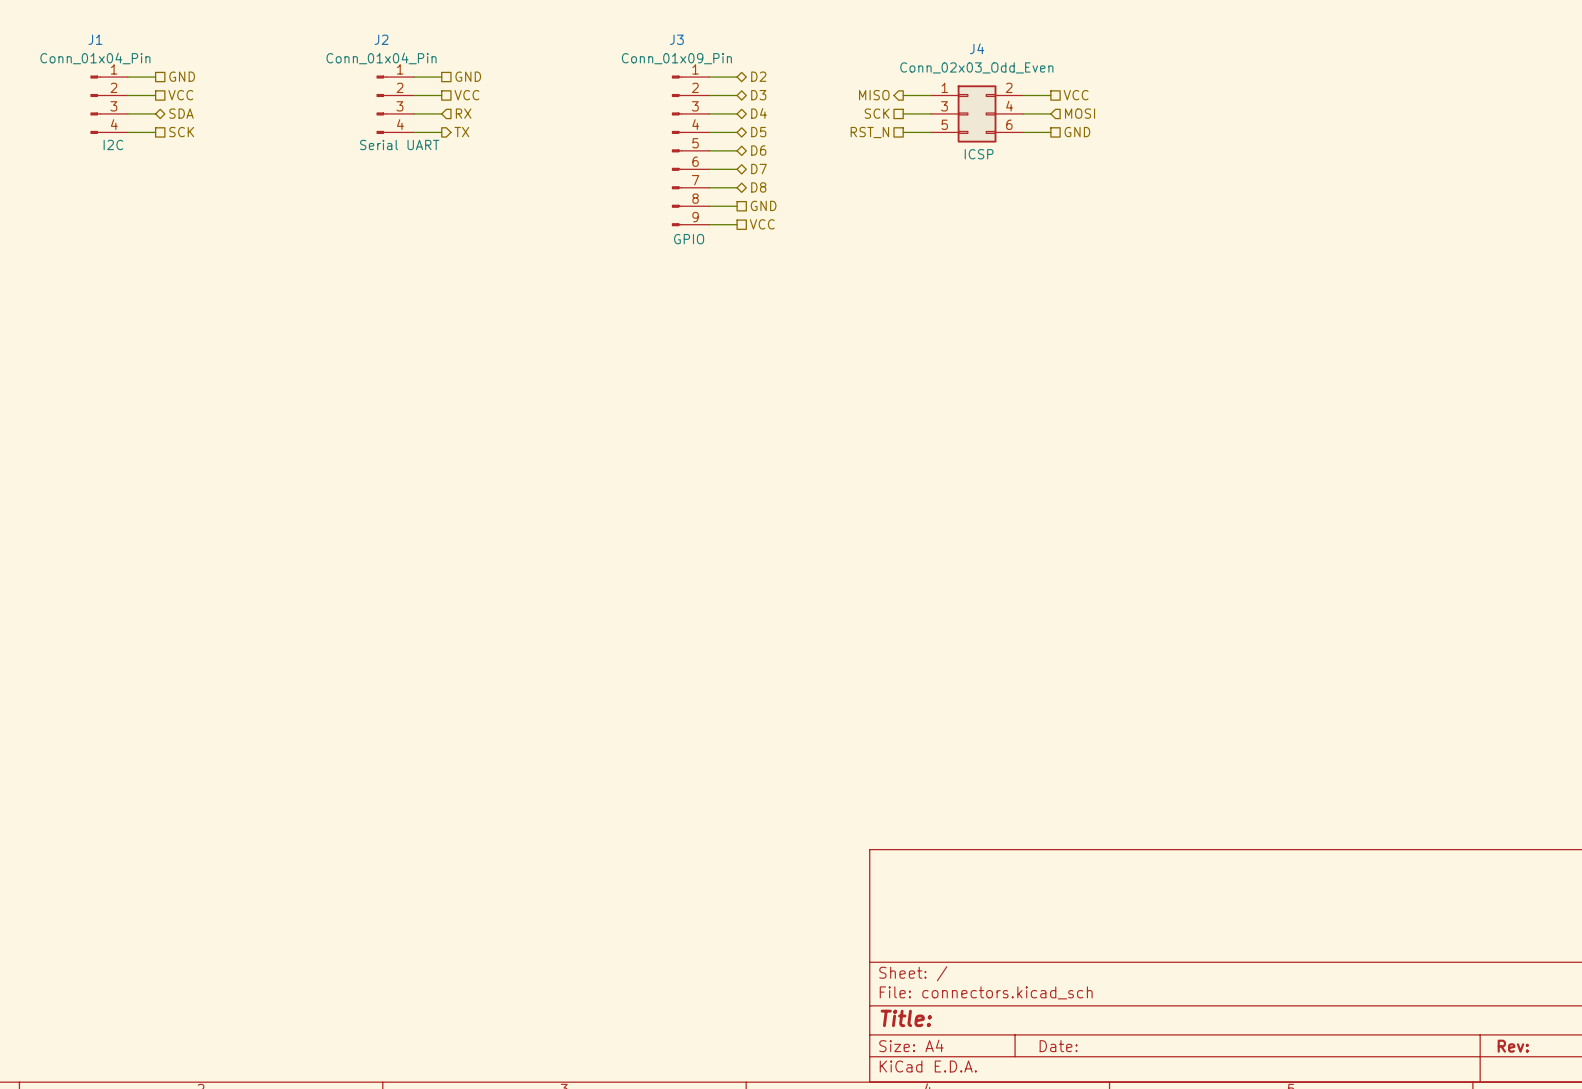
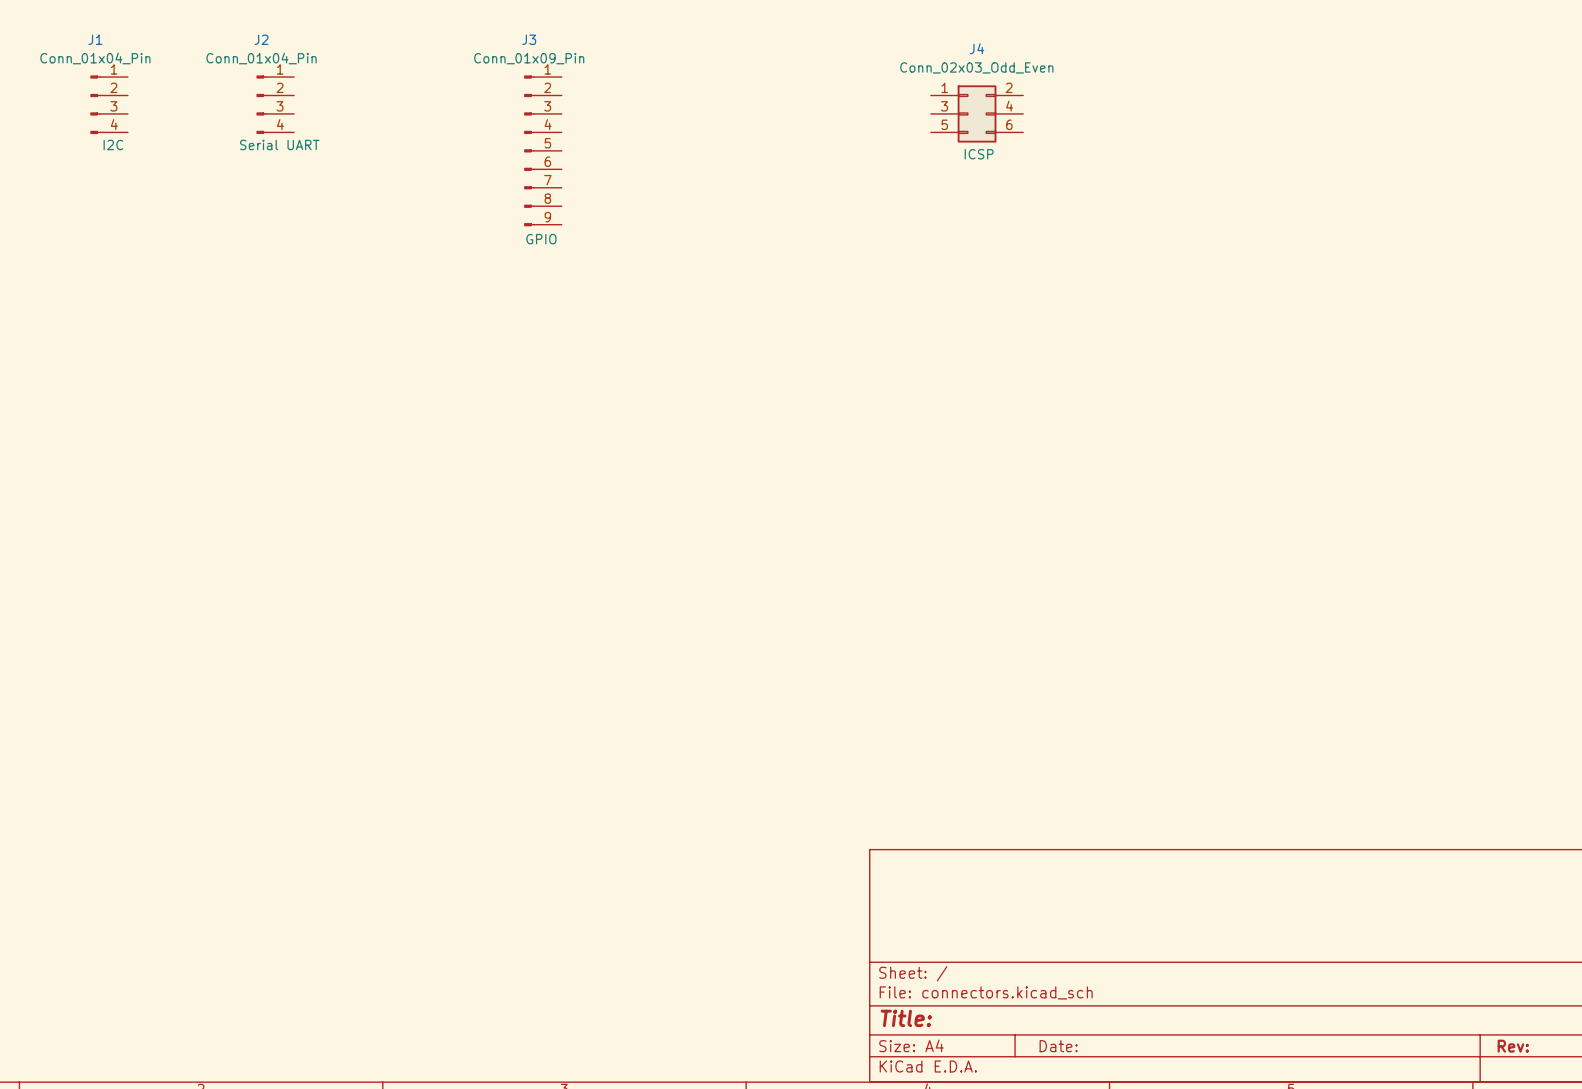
hierarchical label: GND (182, 76) -> none
hierarchical label: GND (468, 76) -> none
hierarchical label: D2 (758, 76) -> none
wire: (127, 77) (155, 77) -> none
wire: (414, 77) (441, 77) -> none
wire: (709, 77) (737, 77) -> none
wire: (127, 95) (155, 95) -> none
hierarchical label: VCC (180, 95) -> none
wire: (414, 95) (441, 95) -> none
hierarchical label: VCC (466, 95) -> none
wire: (709, 95) (737, 95) -> none
hierarchical label: D3 (758, 95) -> none
hierarchical label: MISO (874, 95) -> none
wire: (903, 95) (930, 95) -> none
wire: (1023, 95) (1050, 95) -> none
hierarchical label: VCC (1076, 95) -> none
J2 position: (395, 104) -> (275, 104)
wire: (127, 113) (155, 113) -> none
hierarchical label: SDA (181, 113) -> none
wire: (414, 113) (441, 113) -> none
hierarchical label: RX (463, 113) -> none
wire: (709, 113) (737, 113) -> none
hierarchical label: D4 (758, 113) -> none
hierarchical label: SCK (877, 113) -> none
wire: (903, 113) (930, 113) -> none
wire: (1023, 113) (1050, 113) -> none
hierarchical label: MOSI (1080, 113) -> none
wire: (127, 132) (155, 132) -> none
hierarchical label: SCK (181, 132) -> none
wire: (414, 132) (441, 132) -> none
hierarchical label: TX (461, 132) -> none
wire: (709, 132) (737, 132) -> none
hierarchical label: D5 (758, 132) -> none
hierarchical label: RST_N (869, 132) -> none
wire: (903, 132) (930, 132) -> none
wire: (1023, 132) (1050, 132) -> none
hierarchical label: GND (1077, 132) -> none
J3 position: (690, 150) -> (542, 150)
wire: (709, 150) (737, 150) -> none
hierarchical label: D6 (758, 150) -> none
hierarchical label: D7 (758, 168) -> none
wire: (709, 169) (737, 169) -> none
wire: (709, 187) (737, 187) -> none
hierarchical label: D8 (758, 187) -> none
hierarchical label: GND (763, 205) -> none
wire: (709, 206) (737, 206) -> none
wire: (709, 224) (737, 224) -> none
hierarchical label: VCC (762, 224) -> none

